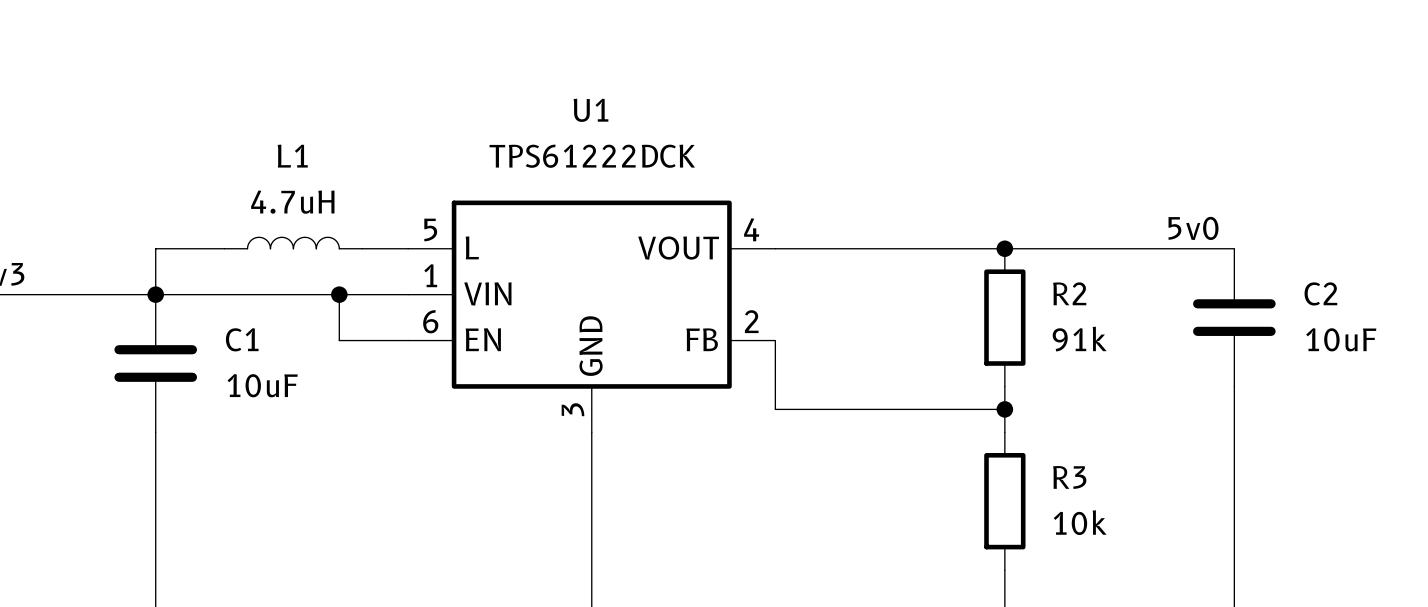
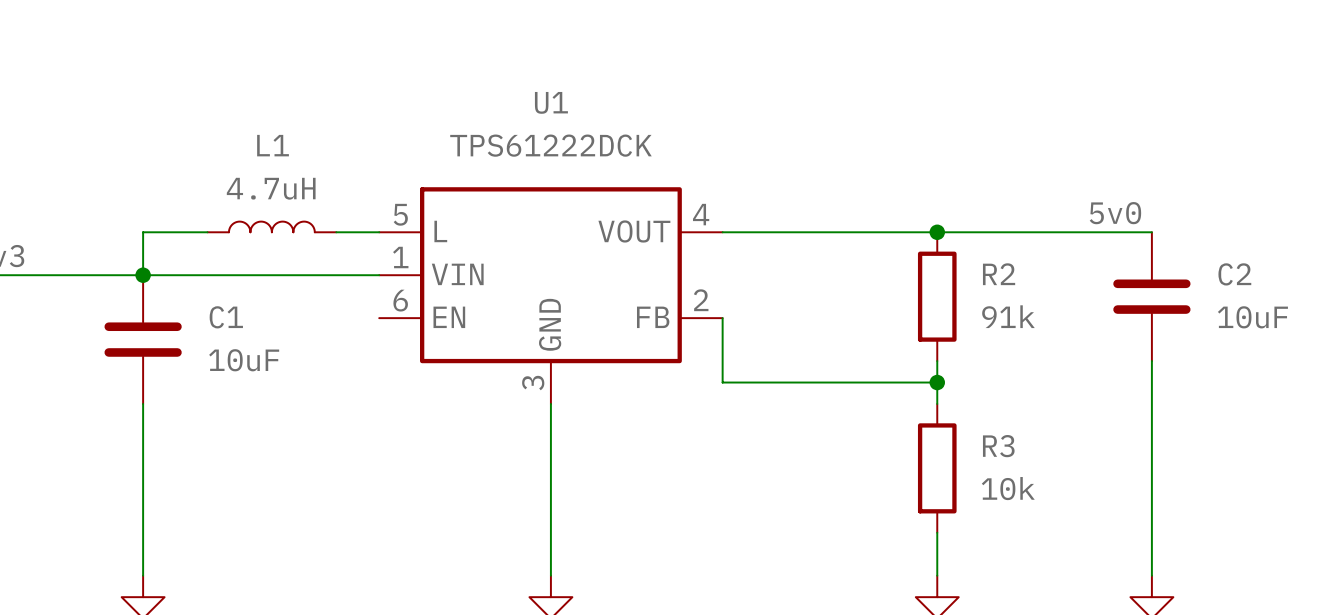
wire: (339, 294) (339, 340) (408, 340) -> none
junction: (339, 294) -> none

